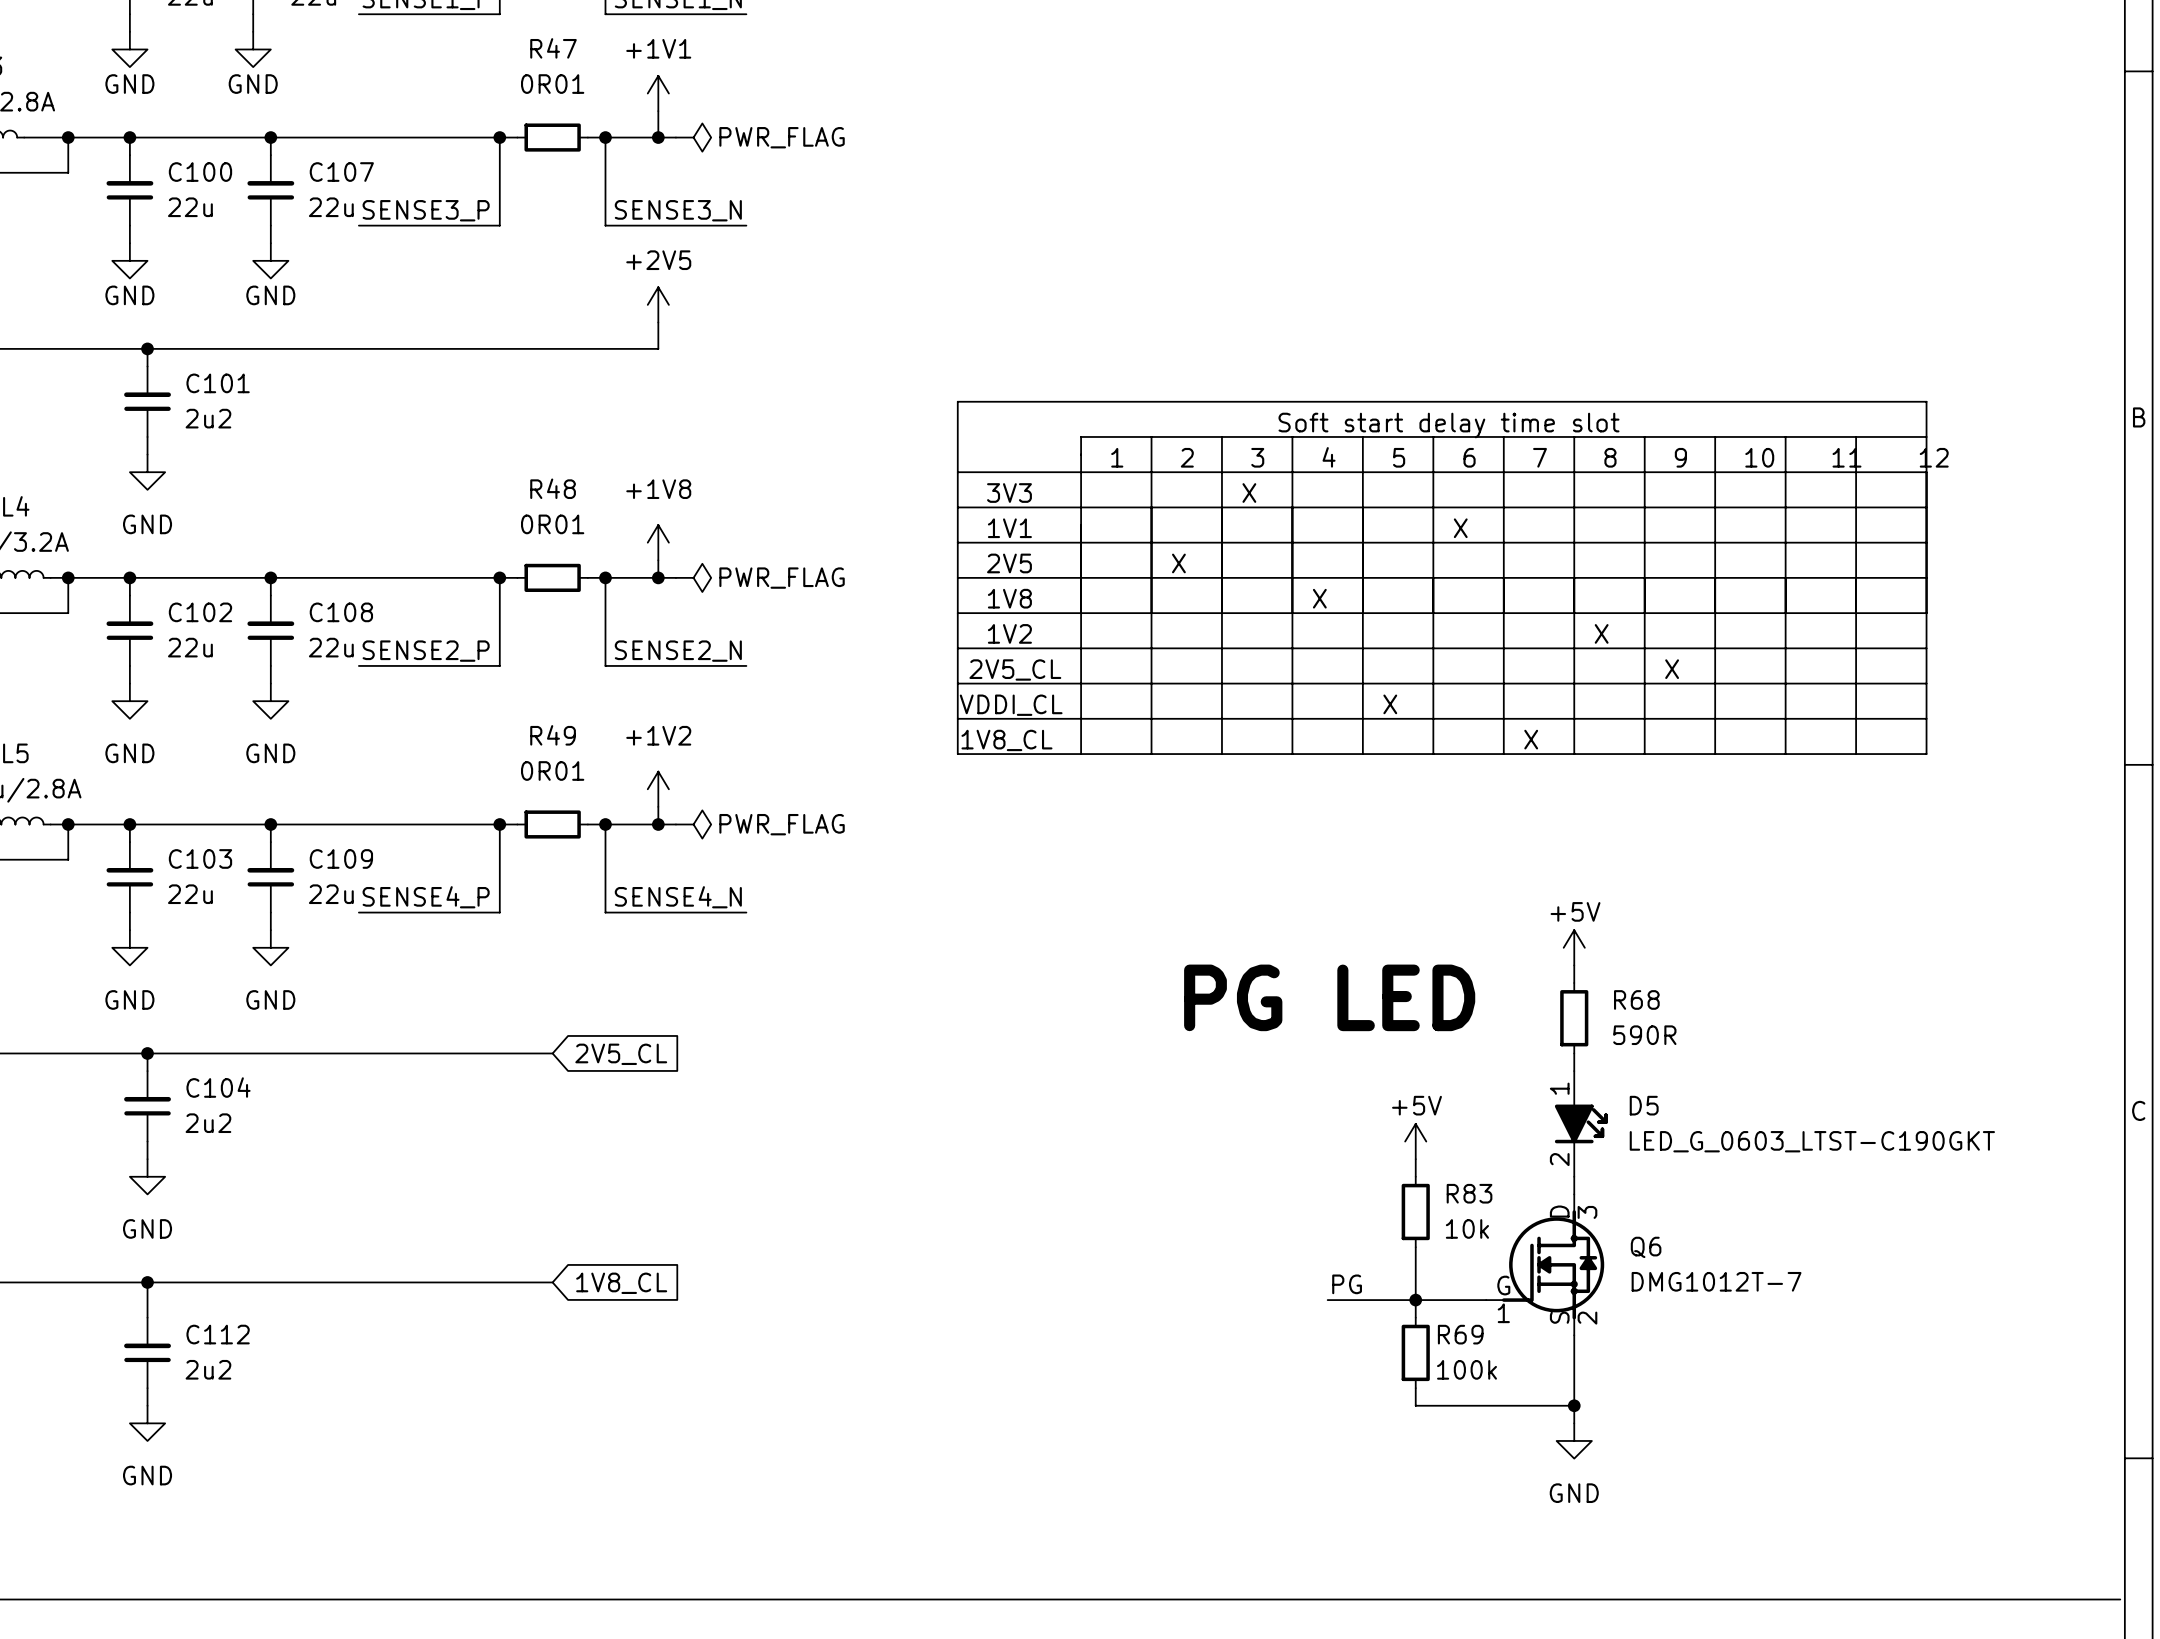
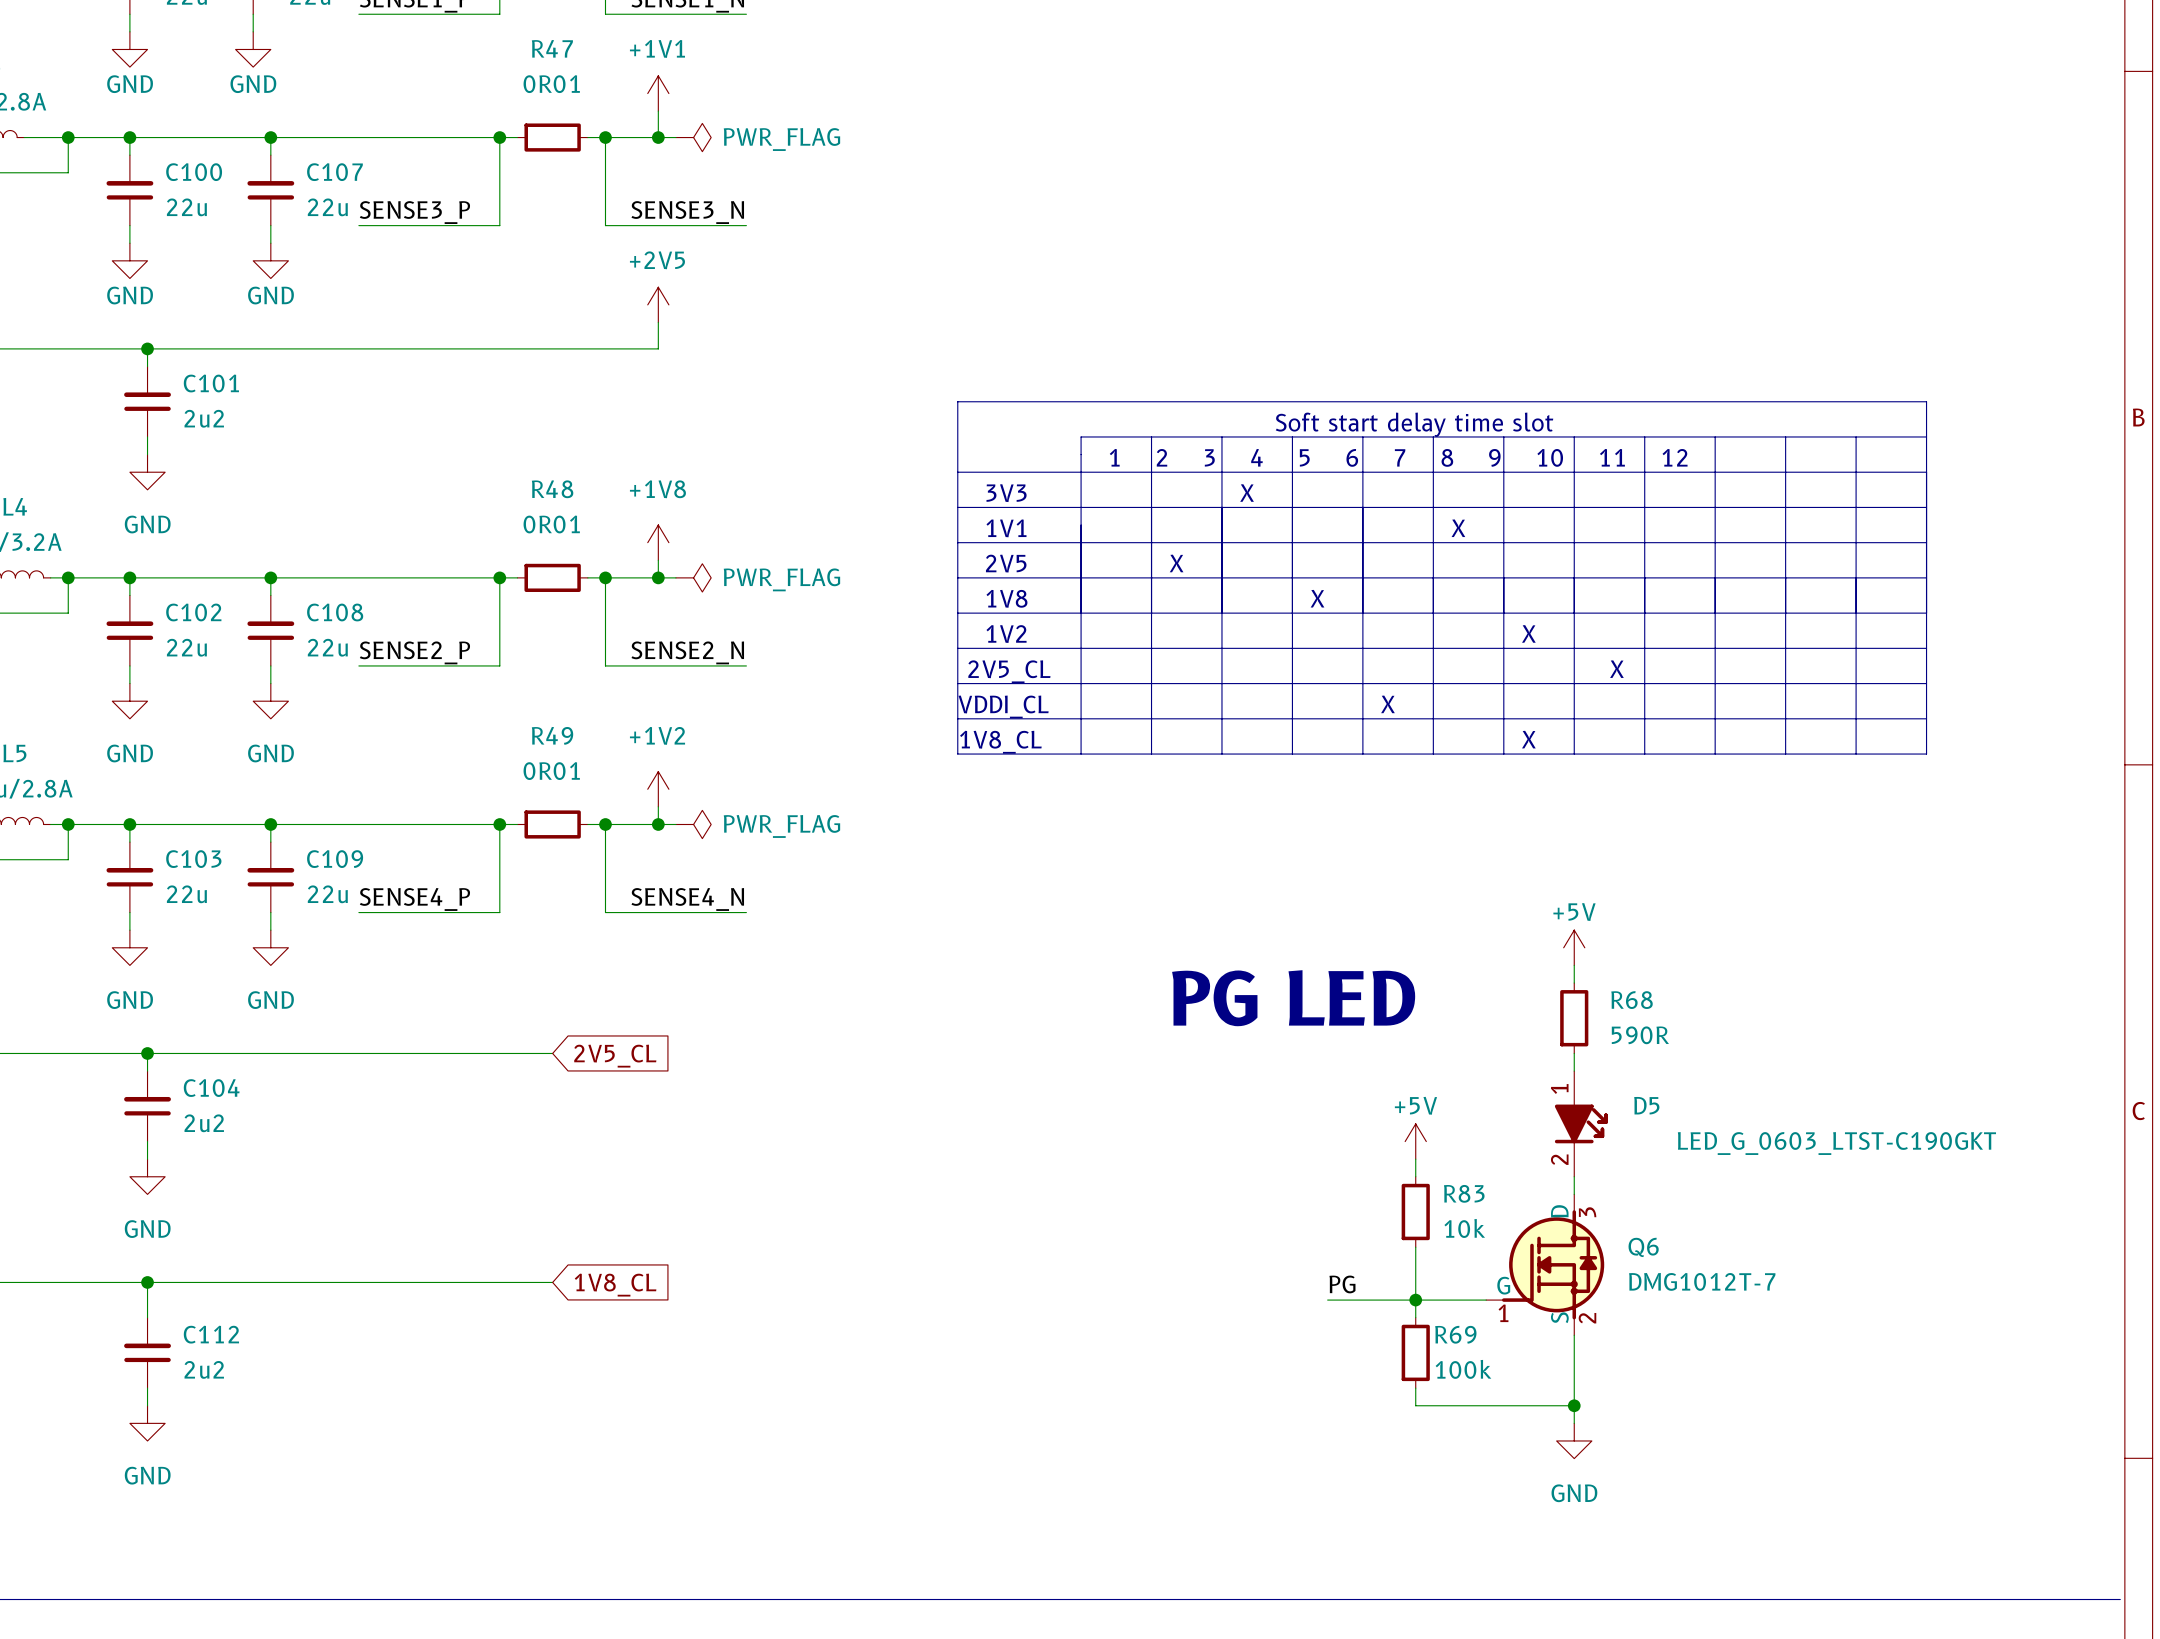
text: none -> X (1528, 633)
text position: X (1601, 633) -> X (1616, 669)
text: X (1672, 669) -> none

